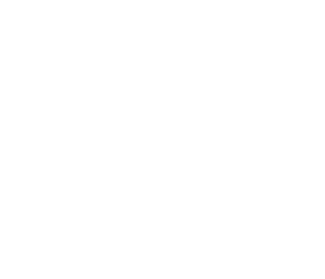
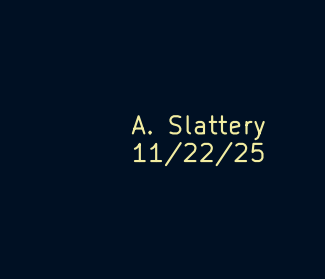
text: none -> A. Slattery (198, 127)
text: none -> 11/22/25 (198, 154)

